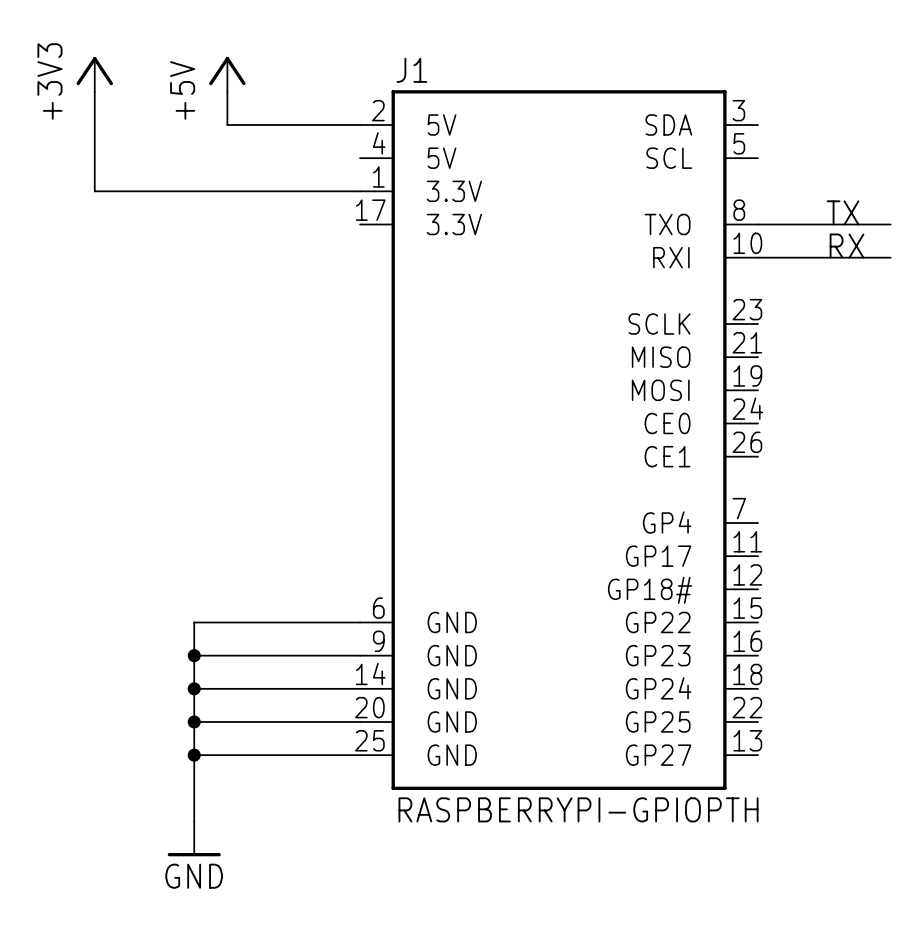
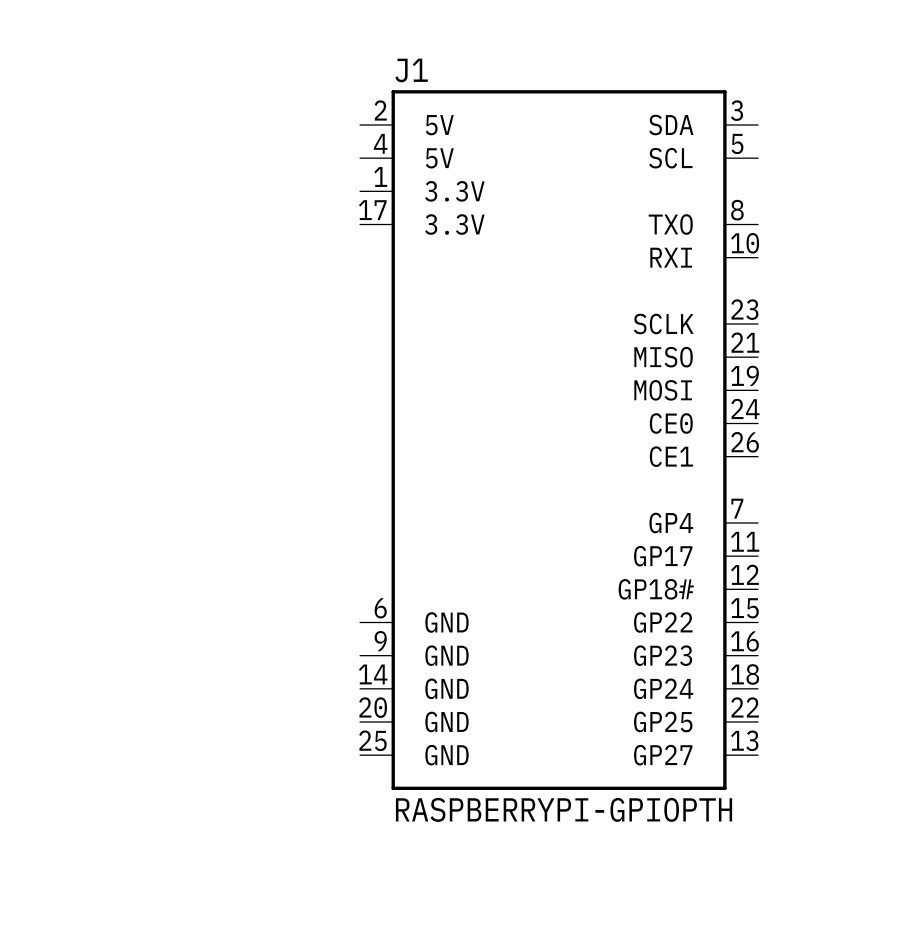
power symbol: +3V3 (94, 74) -> none
power symbol: +5V (227, 74) -> none
wire: (94, 91) (94, 191) (360, 191) -> none
wire: (227, 91) (227, 125) (360, 125) -> none
label: TX (843, 212) -> none
wire: (758, 224) (890, 224) -> none
label: RX (847, 246) -> none
wire: (758, 257) (890, 257) -> none
wire: (360, 622) (194, 622) (194, 821) -> none
wire: (194, 655) (360, 655) -> none
junction: (194, 655) -> none
wire: (194, 688) (360, 688) -> none
junction: (194, 688) -> none
wire: (194, 721) (360, 721) -> none
junction: (194, 721) -> none
wire: (194, 755) (360, 755) -> none
junction: (194, 755) -> none
power symbol: GND (194, 838) -> none

